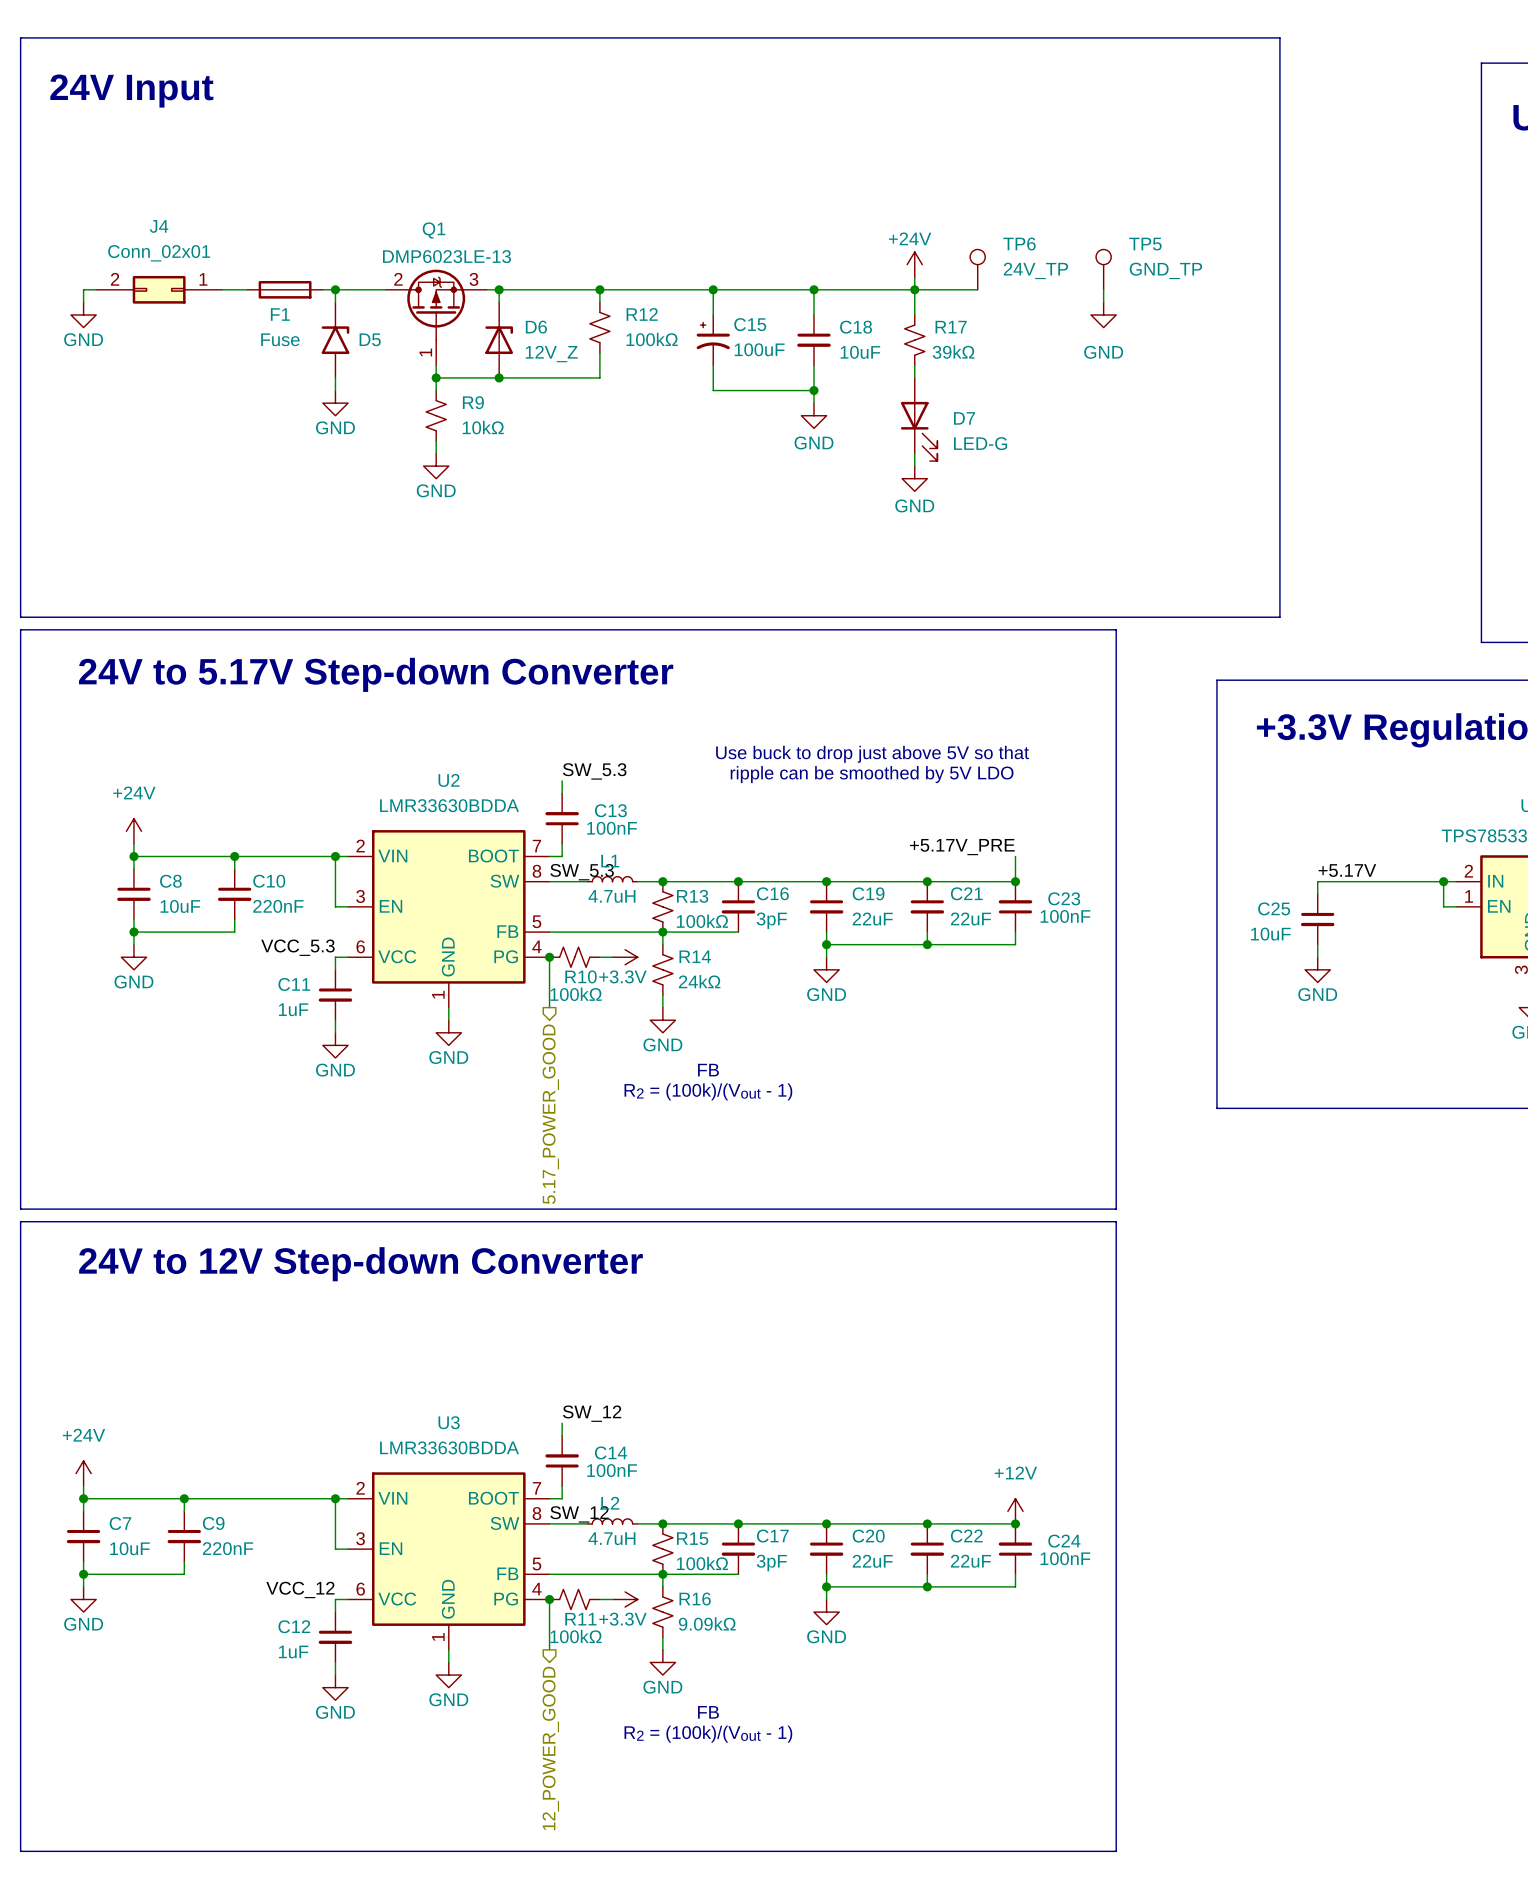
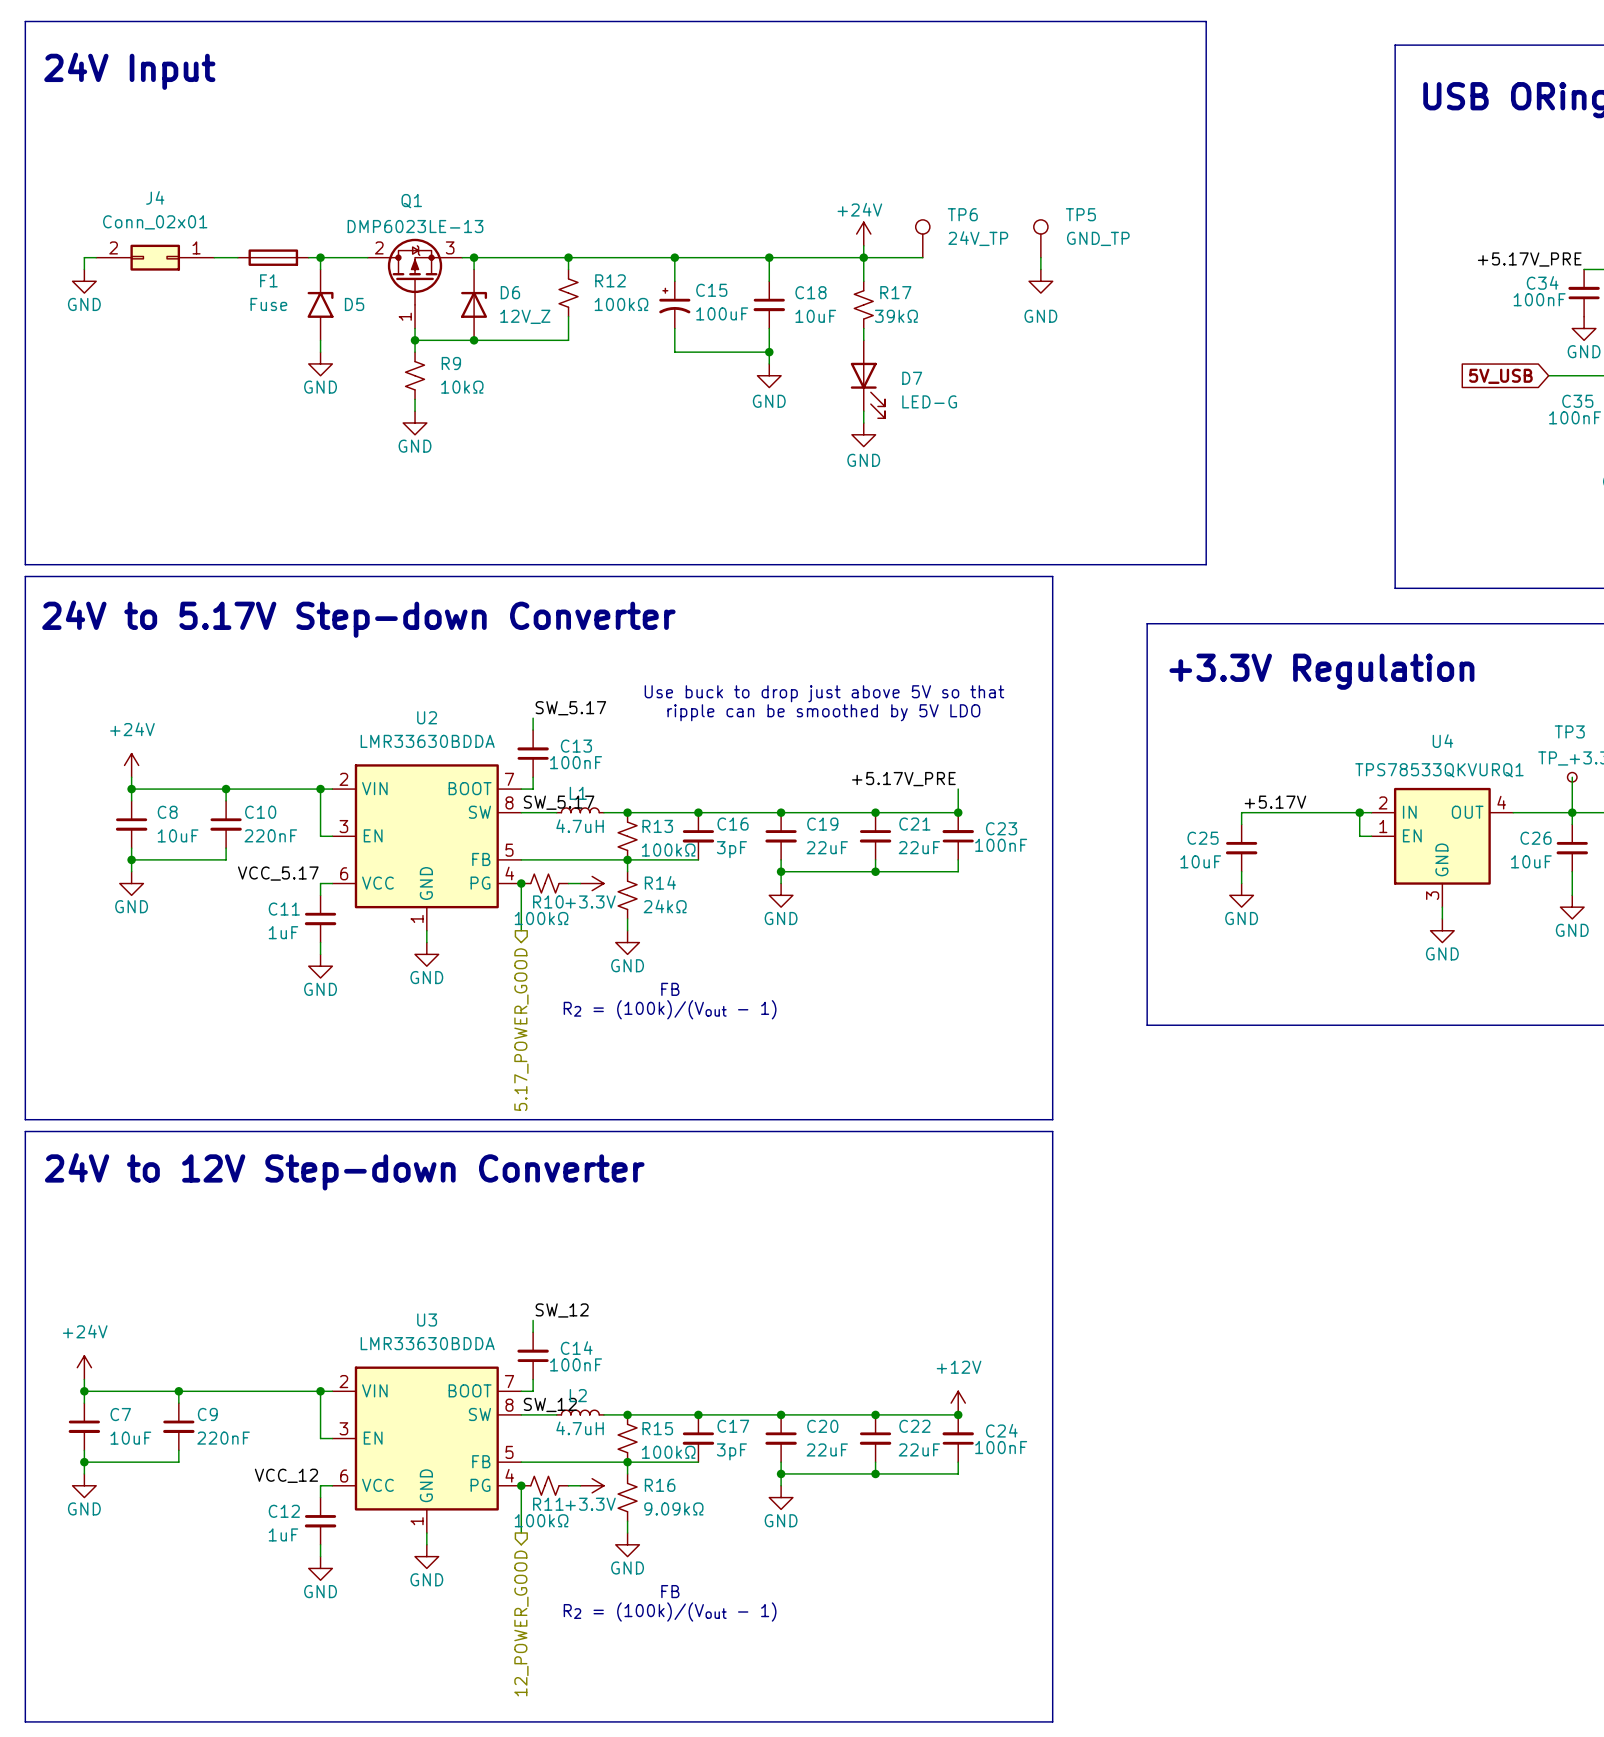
label: SW_5.3 (594, 771) -> SW_5.17 (570, 708)
label: SW_5.3 (582, 872) -> SW_5.17 (559, 802)
label: VCC_5.3 (297, 947) -> VCC_5.17 (278, 873)

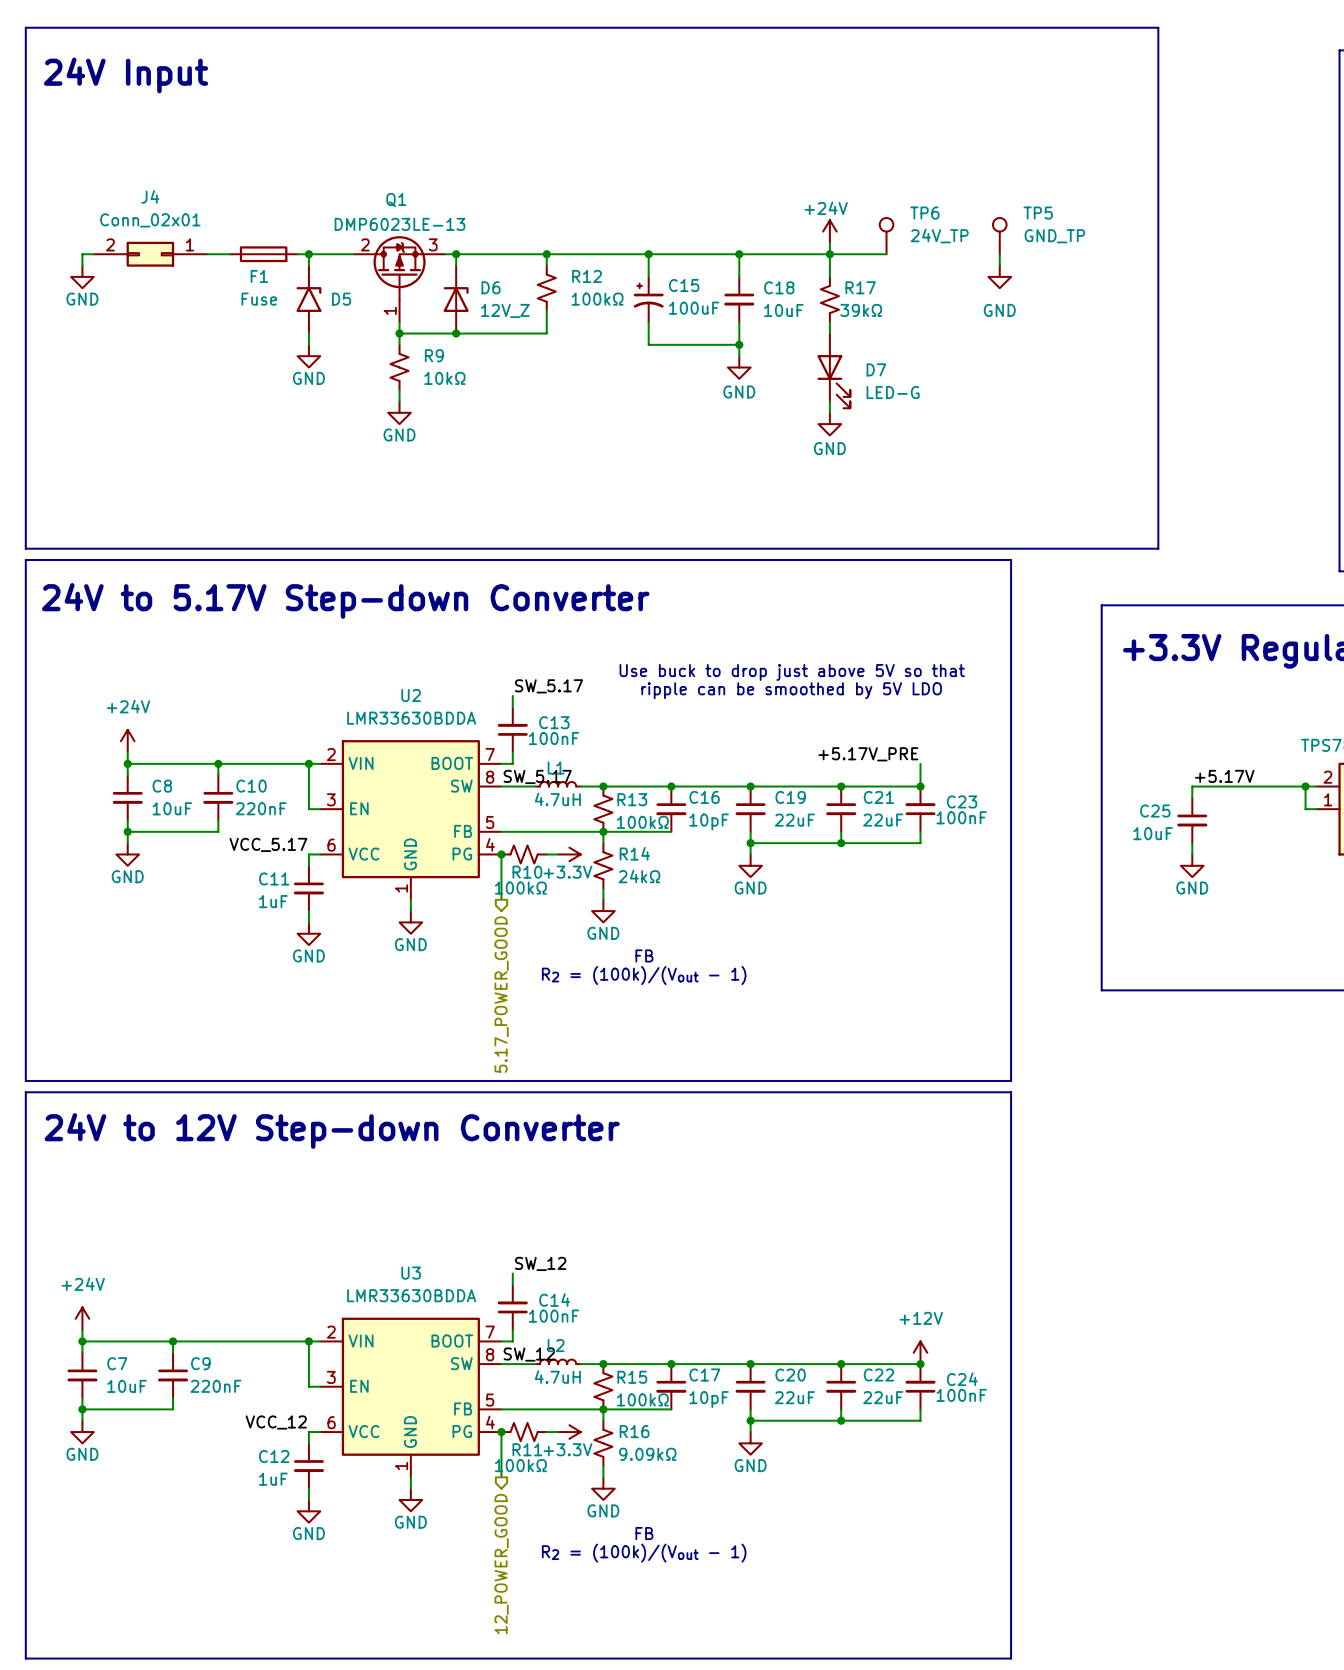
C16 value: 3pF (731, 849) -> 10pF (709, 821)
C17 value: 3pF (731, 1451) -> 10pF (709, 1399)

